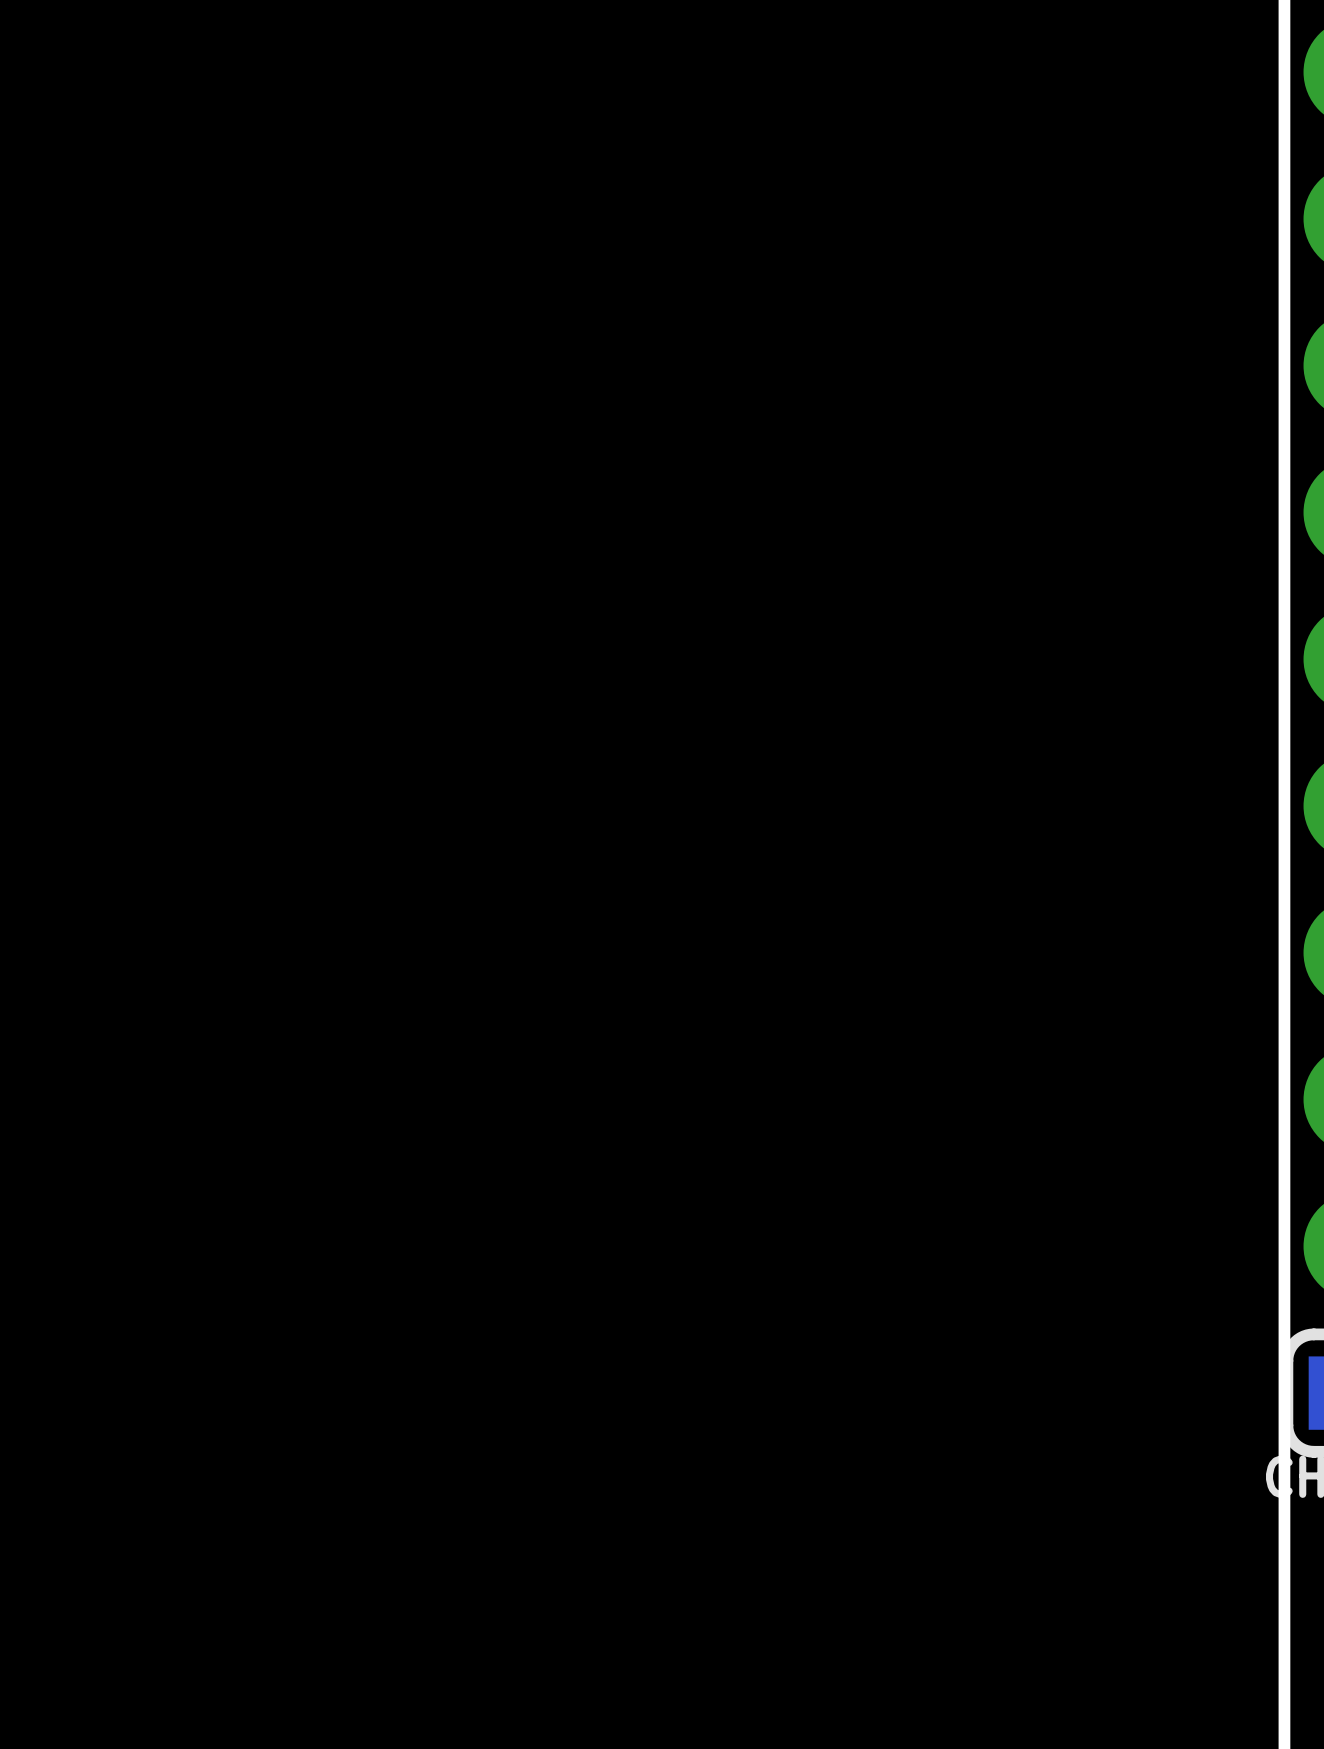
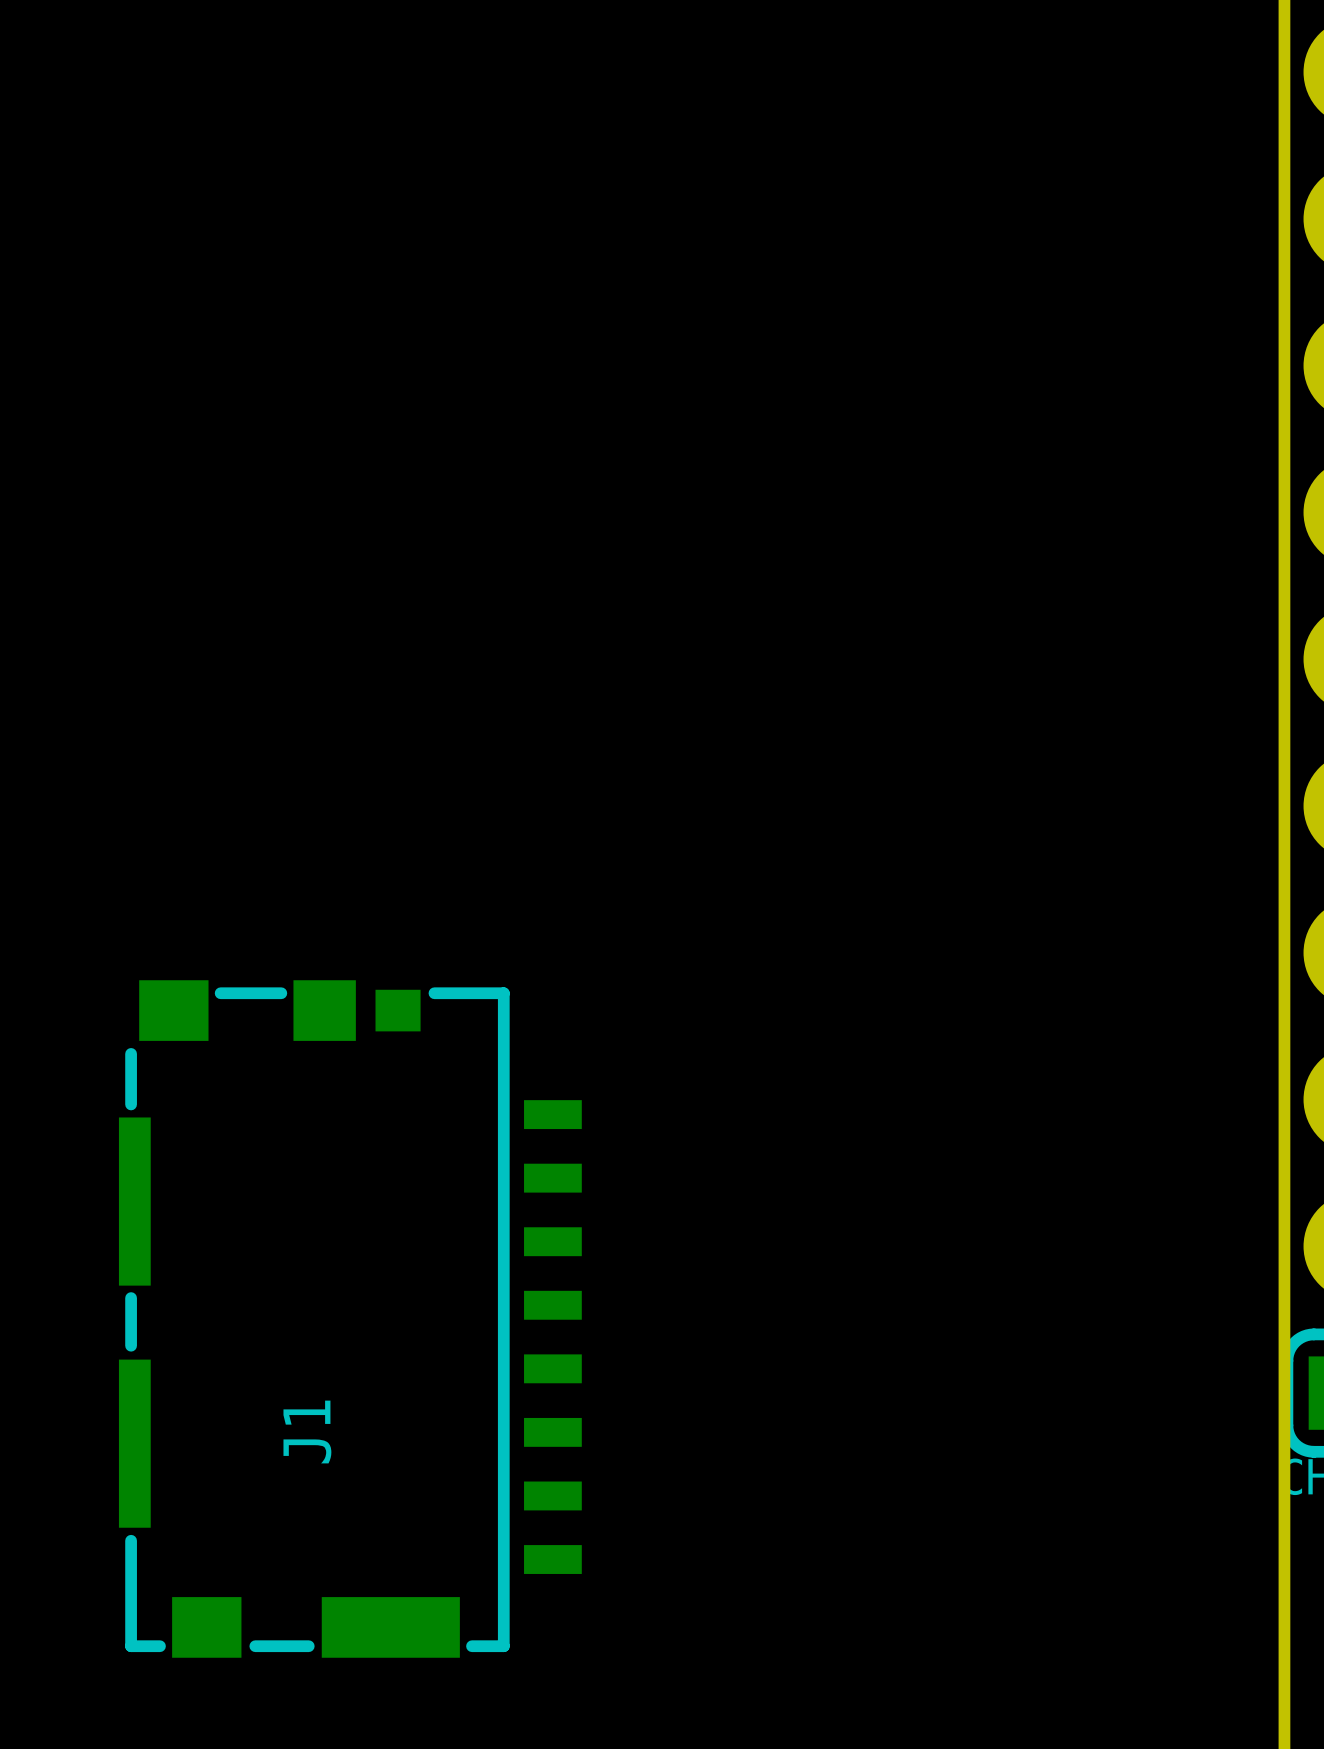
J1: none -> (350, 1319)

